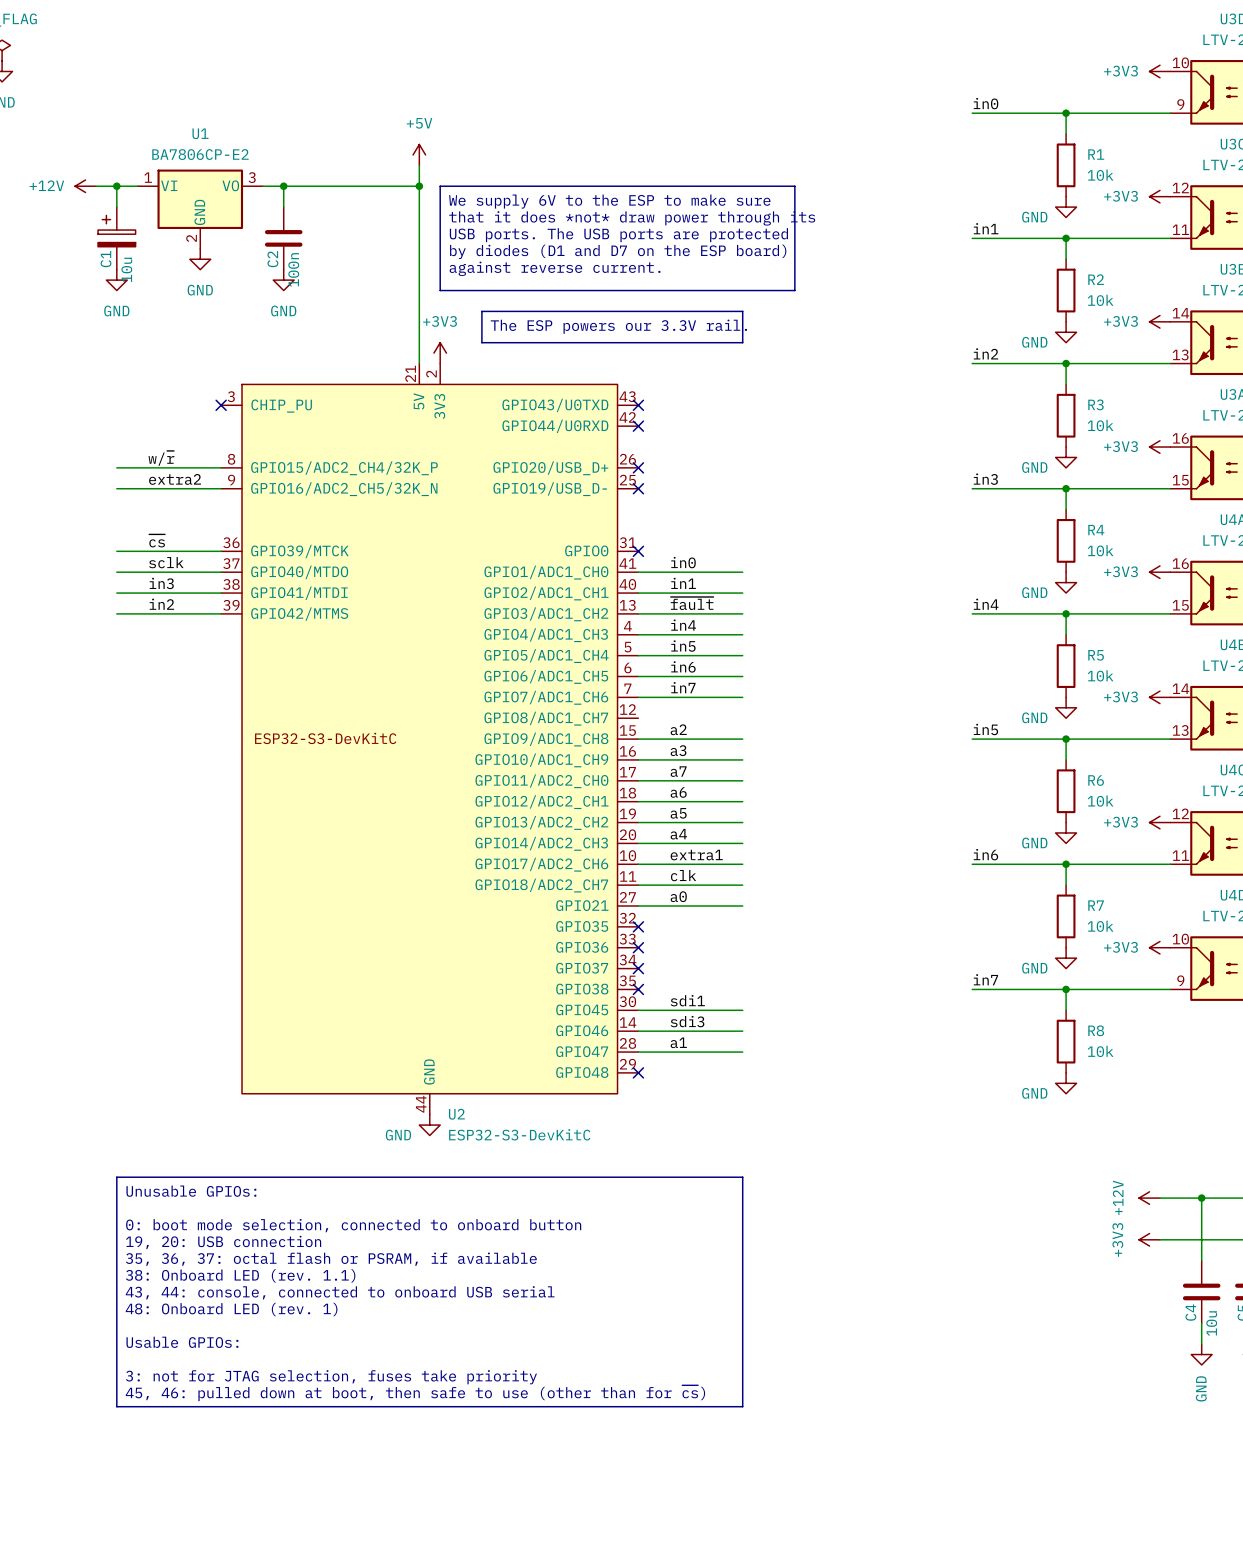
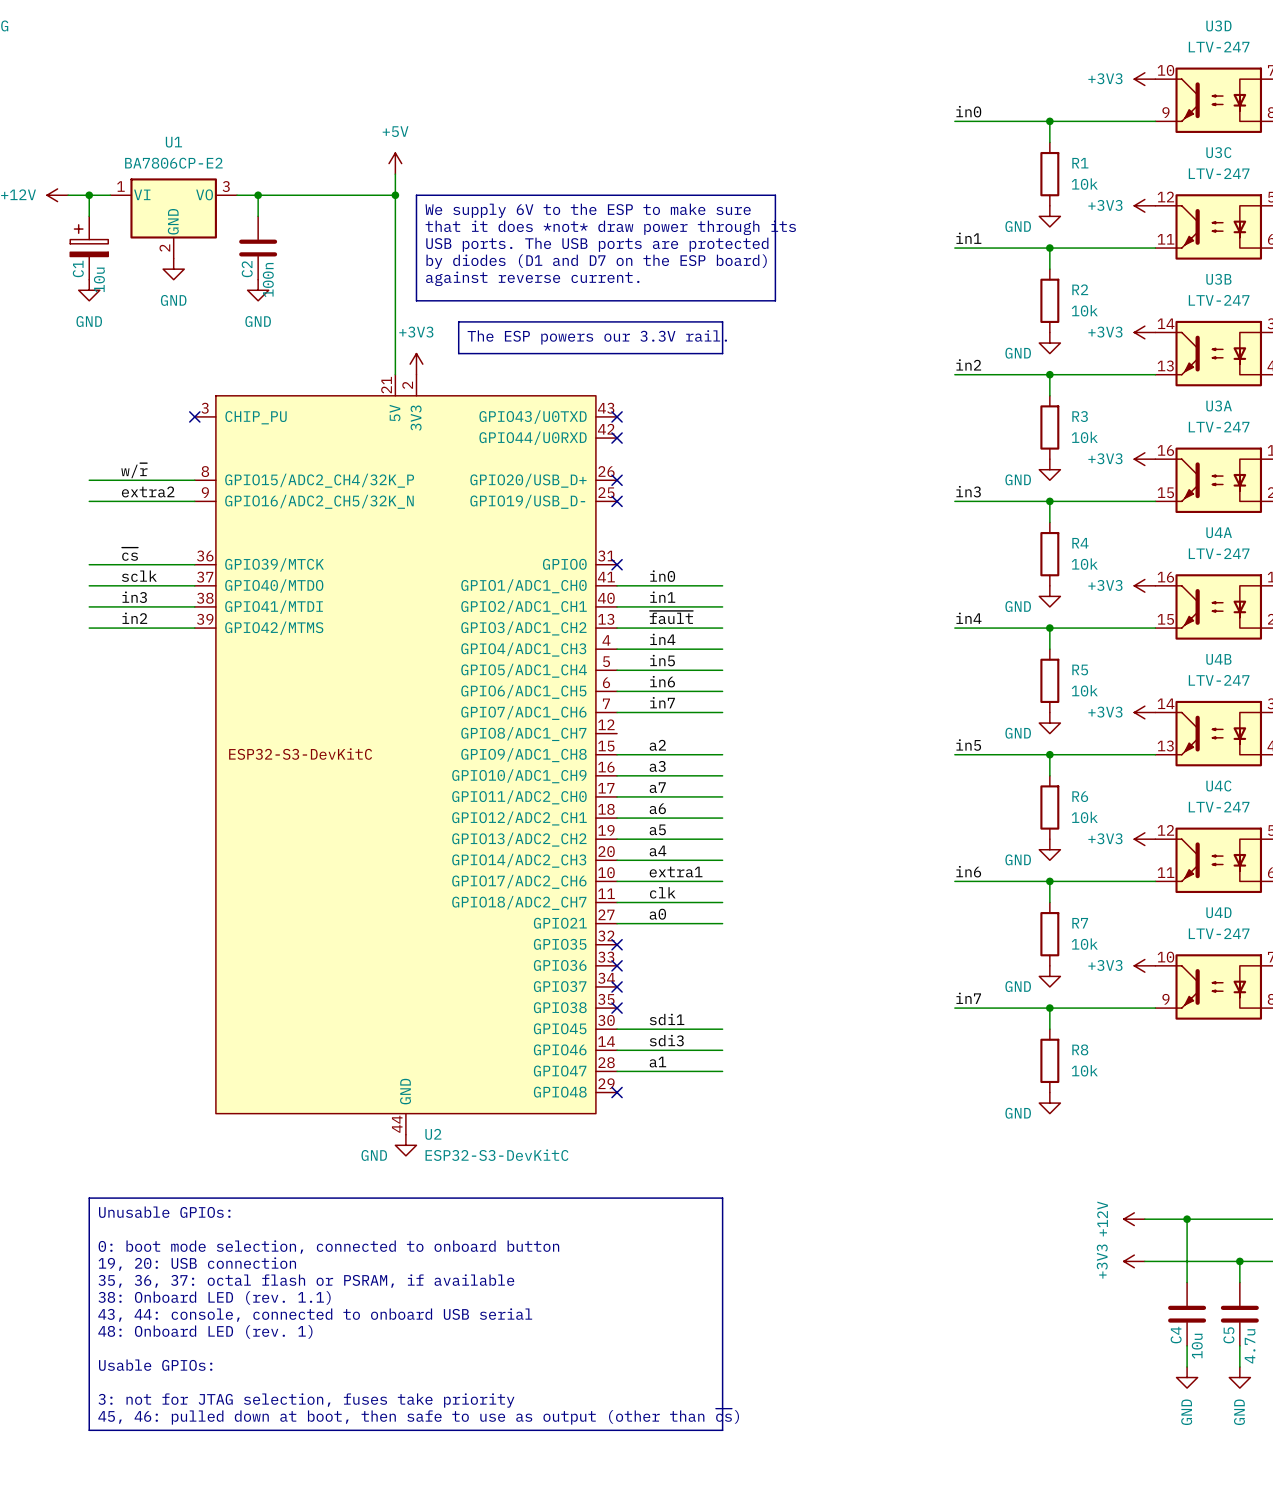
text: 45, 46: pulled down at boot, then safe to use (other than for ~{cs}) (415, 1393) -> 45, 46: pulled down at boot, then safe to use as output (other than ~{cs}) (418, 1416)

